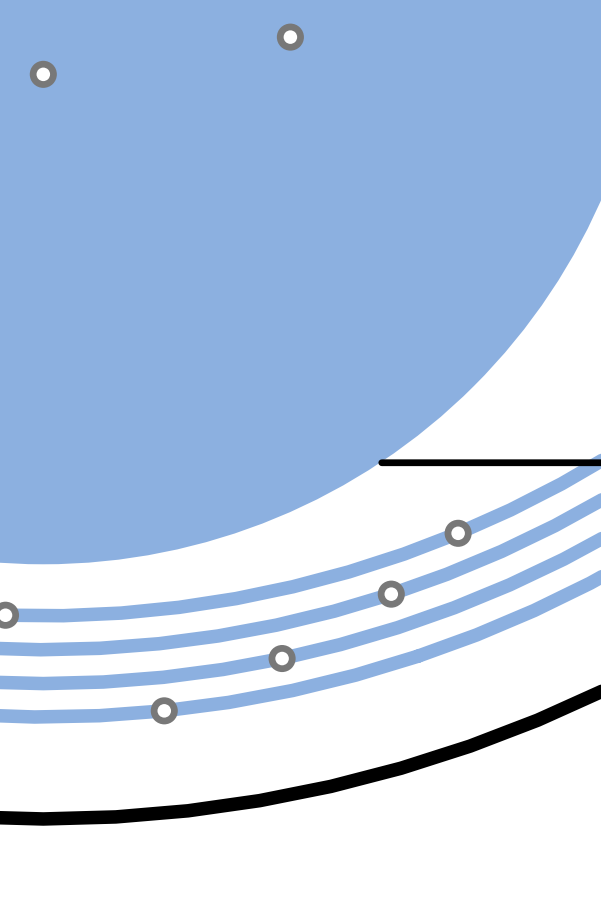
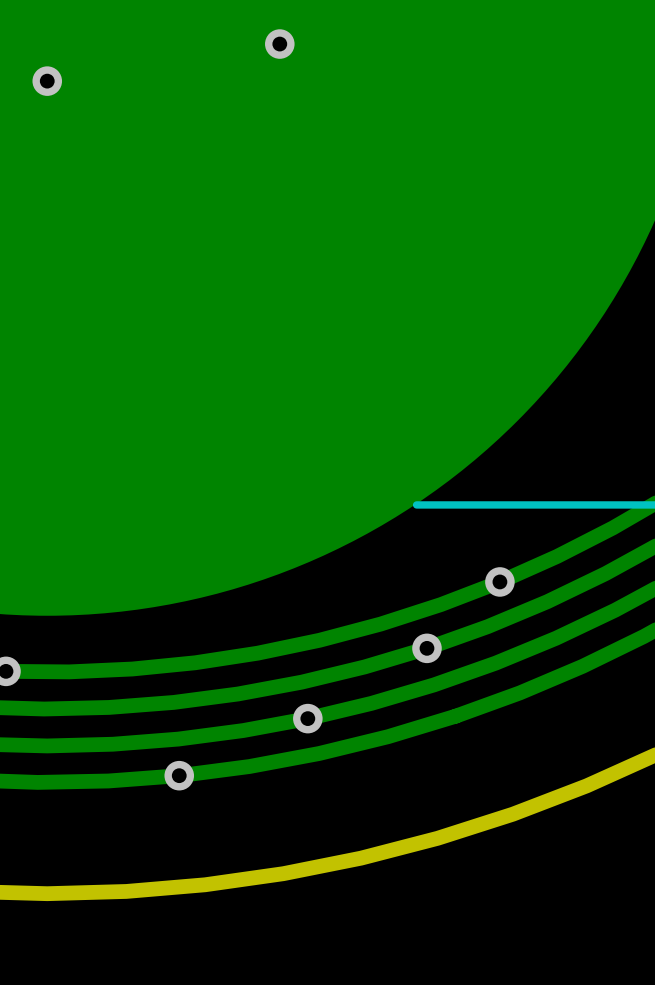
via position: (290, 37) -> (279, 44)

